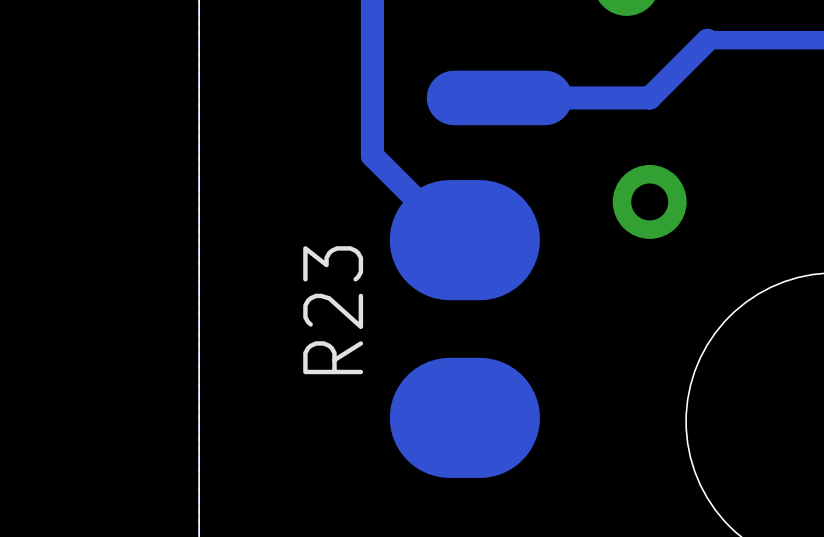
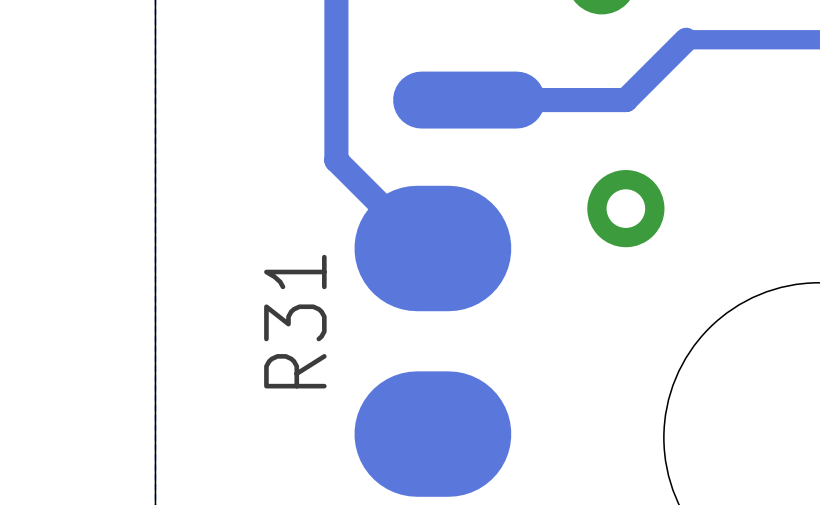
R23 name: R23 (333, 310) -> R31 (295, 321)

